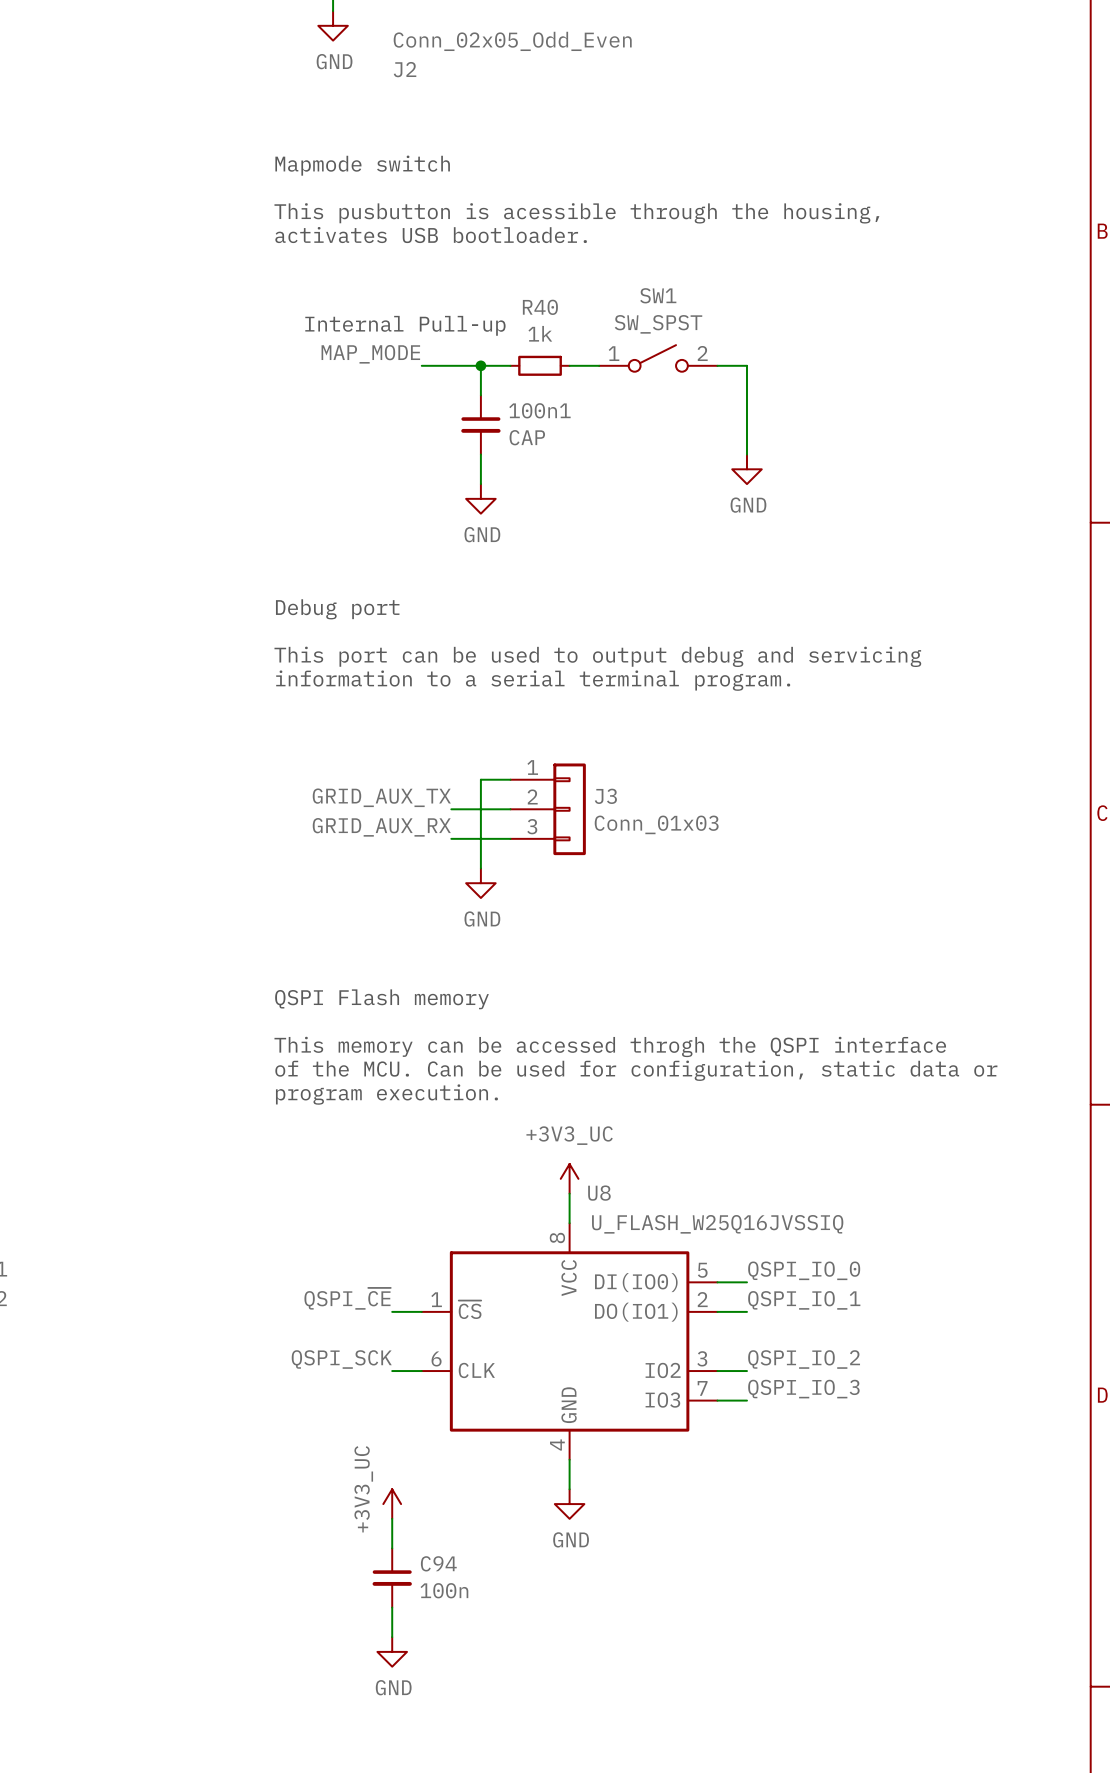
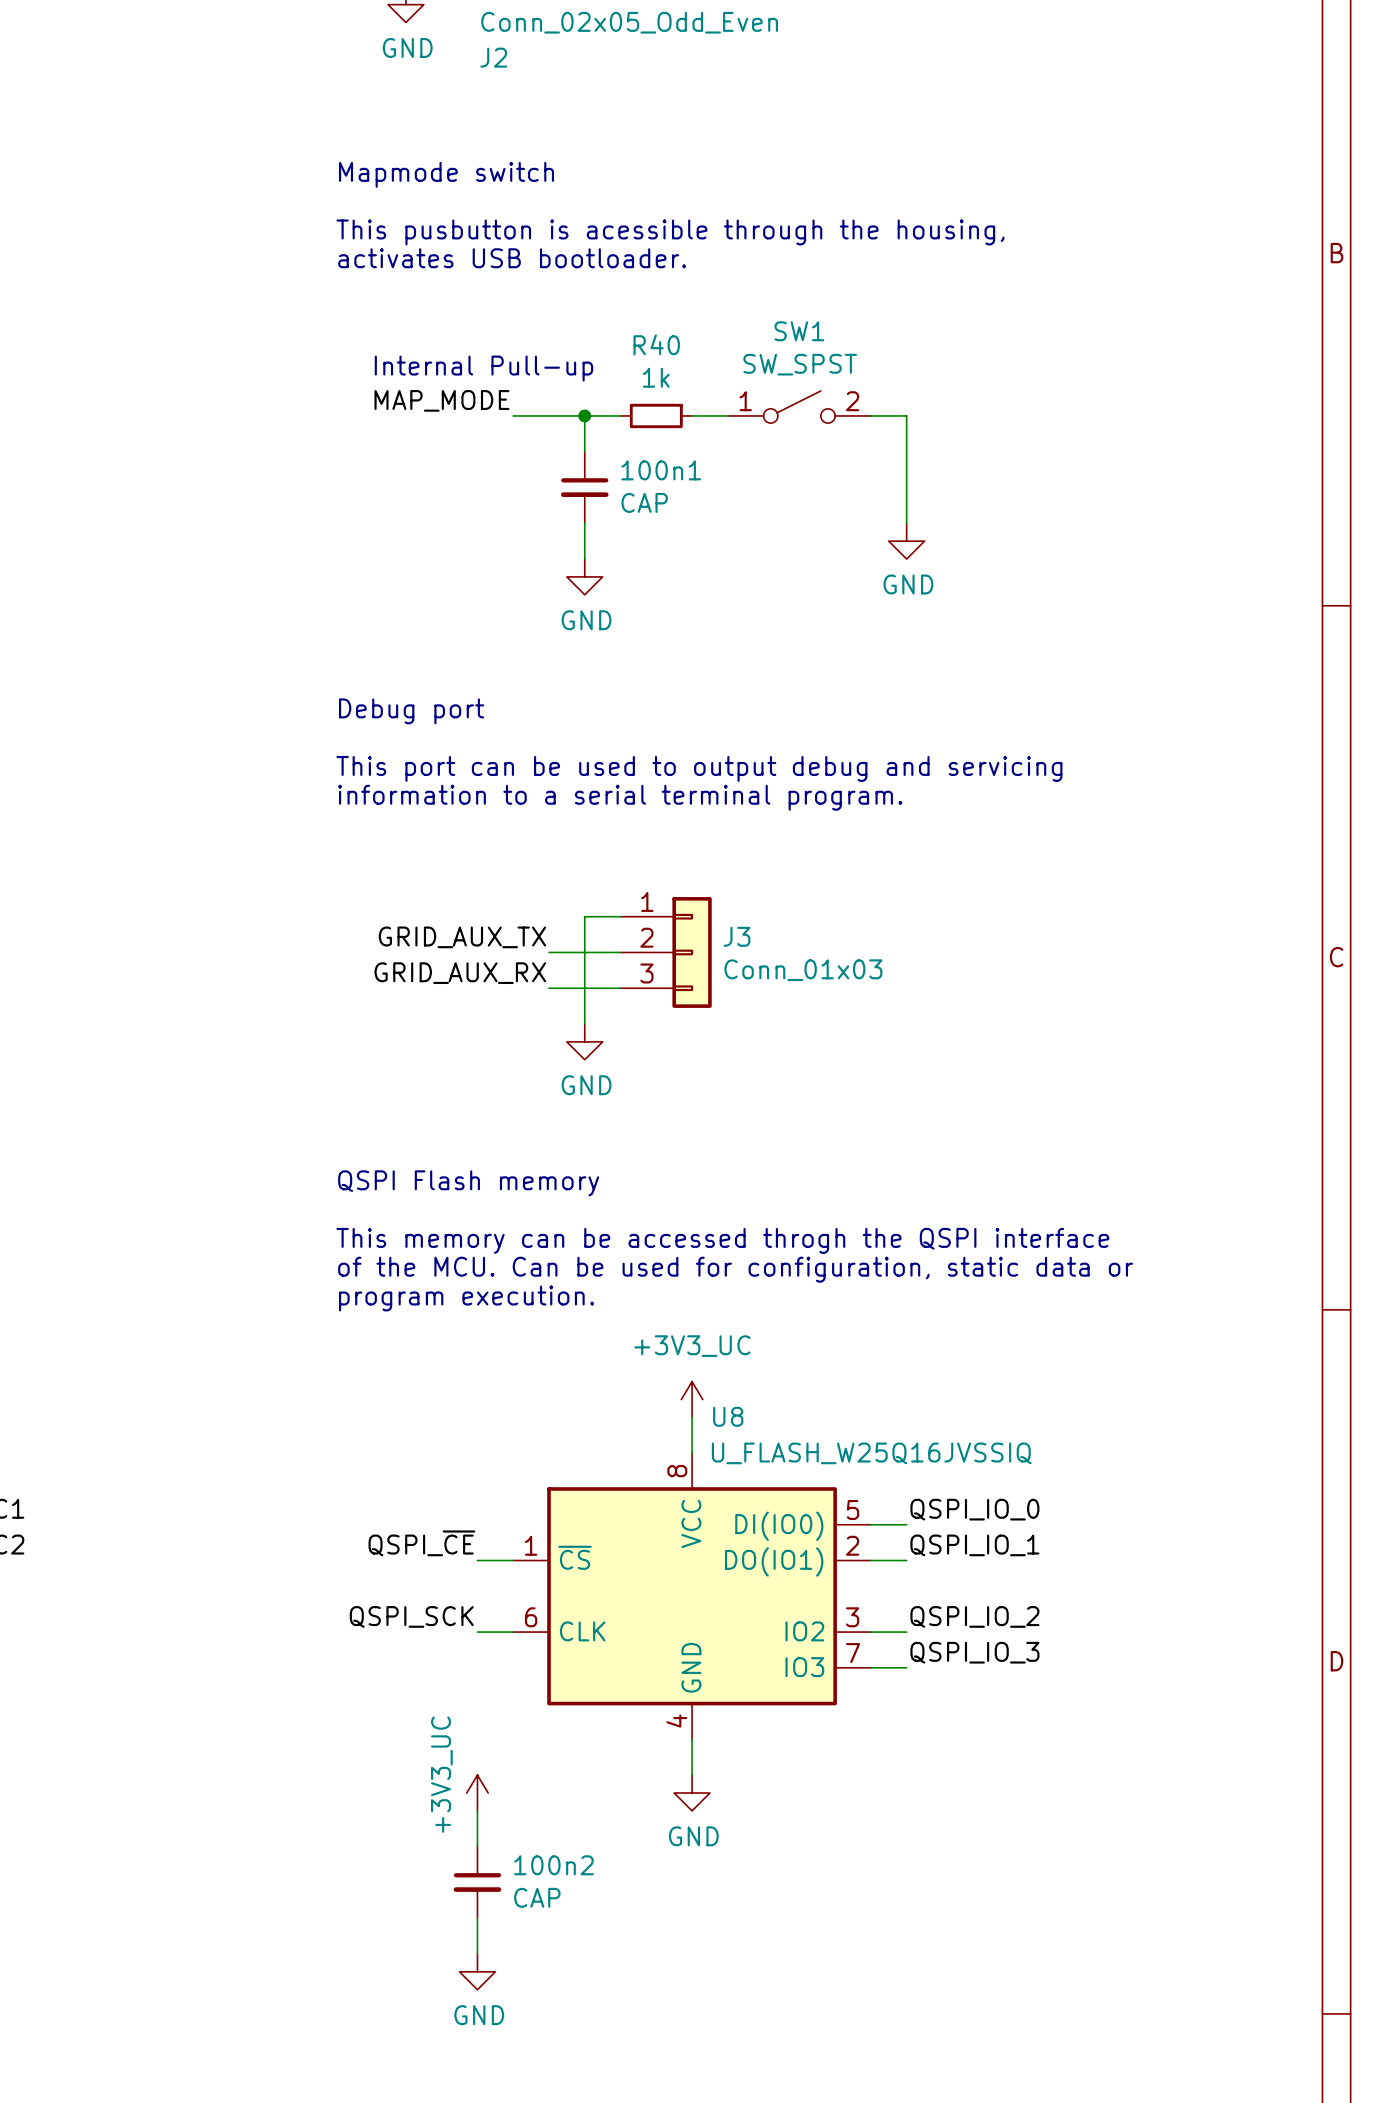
C94 name: C94 (438, 1563) -> 100n2 (553, 1865)
C94 value: 100n (444, 1590) -> CAP (537, 1897)

